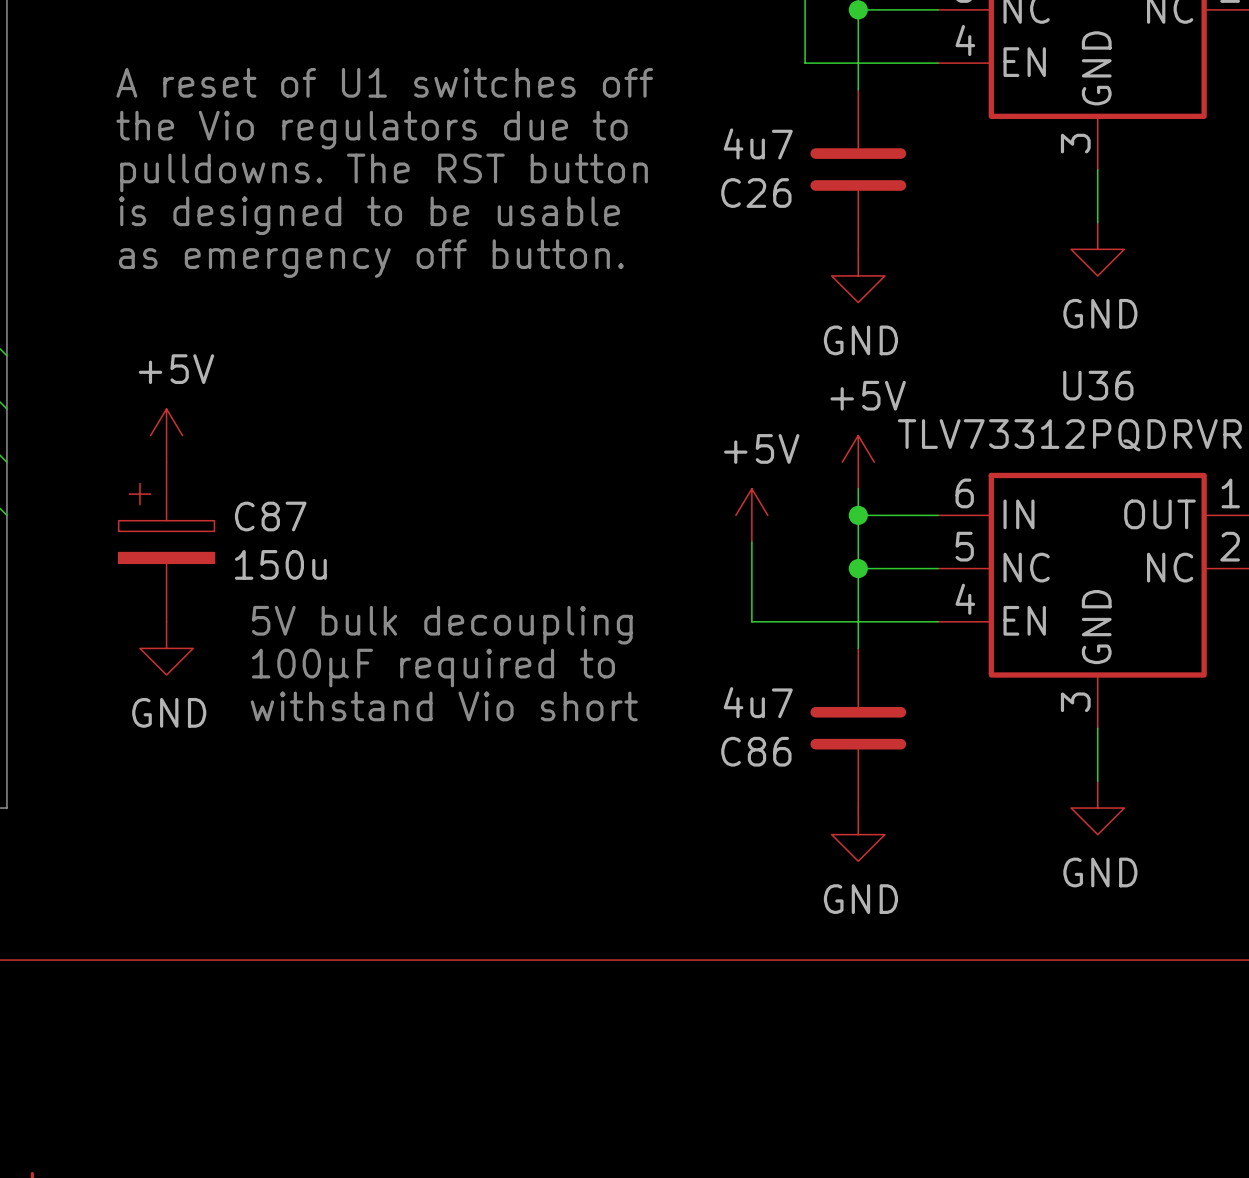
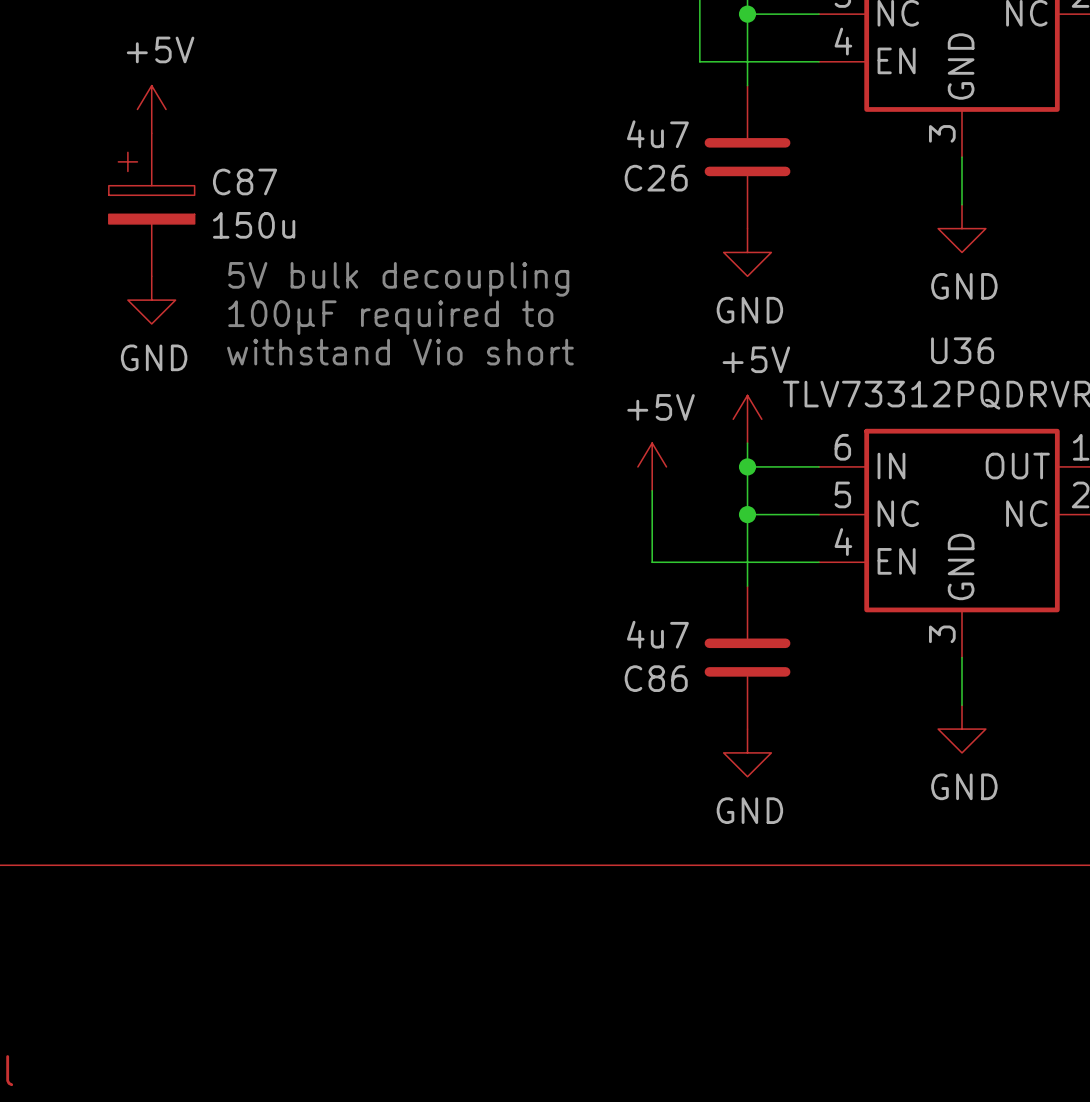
text: A reset of U1 switches off (384, 82) -> none
text: the Vio regulators due to (372, 130) -> none
text: pulldowns. The RST button (384, 172) -> none
text: is designed to be usable (369, 215) -> none
text: as emergency off button. (371, 258) -> none
power symbol position: +5V (166, 435) -> +5V (151, 109)
C87 position: (166, 541) -> (151, 204)
text position: 5V bulk decoupling (442, 625) -> 5V bulk decoupling (398, 279)
power symbol position: GND (166, 648) -> GND (151, 300)
text position: 100µF required to (433, 668) -> 100µF required to (390, 317)
text position: withstand Vio short (444, 706) -> withstand Vio short (400, 352)

